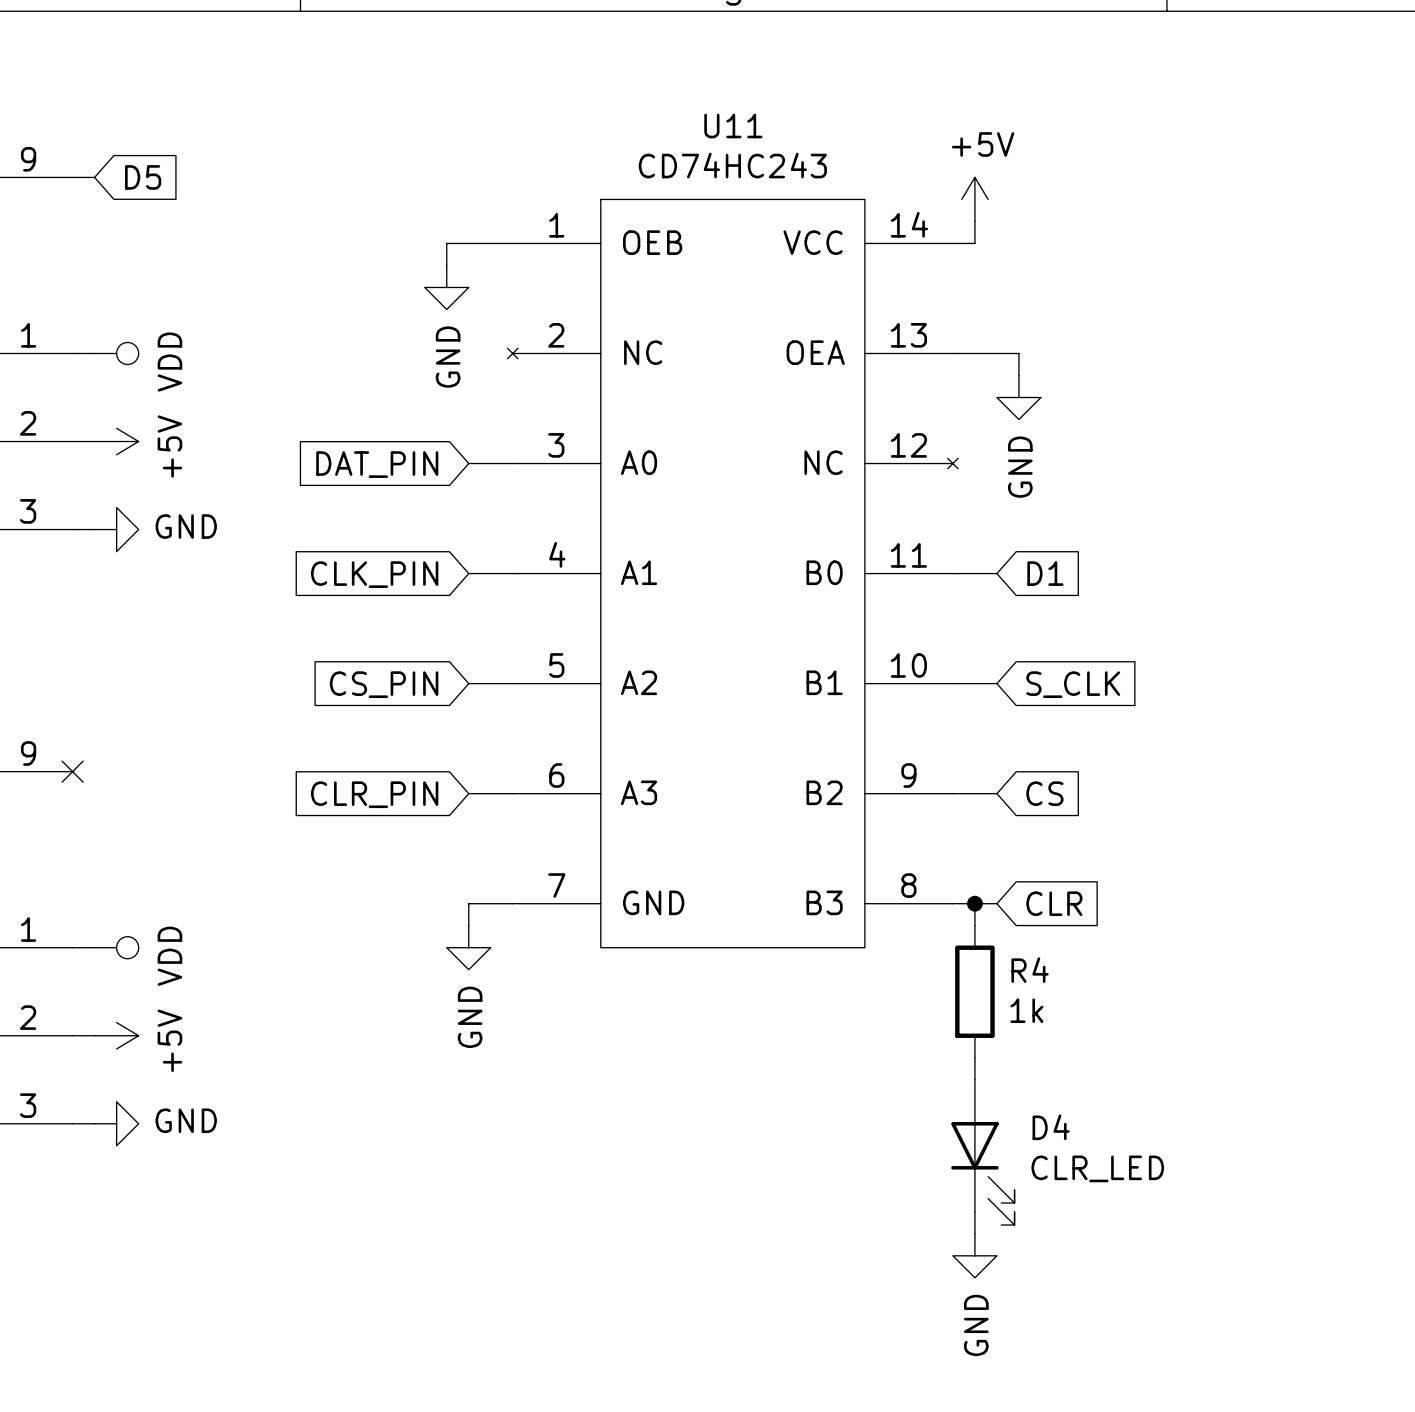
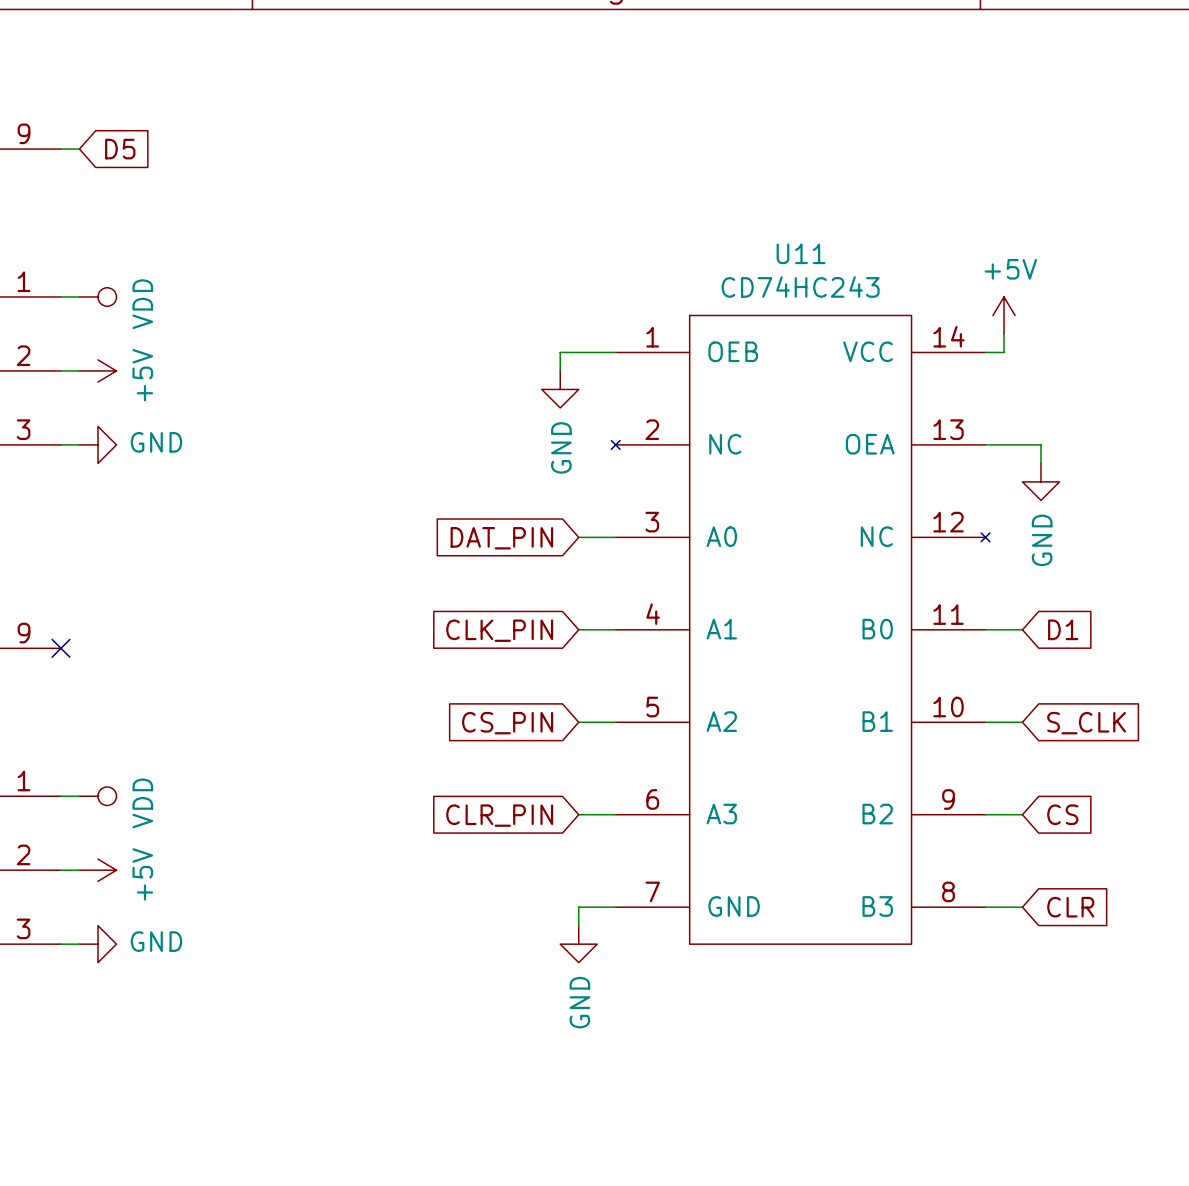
power symbol position: +5V (974, 199) -> +5V (1004, 315)
wire: (974, 221) (974, 243) (952, 243) -> (1004, 333) (1004, 352) (985, 352)
wire: (512, 243) (446, 243) (446, 265) -> (615, 352) (560, 352) (560, 370)
power symbol: GND (446, 287) -> none
wire: (952, 353) (1018, 353) (1018, 375) -> (985, 444) (1040, 444) (1040, 463)
power symbol: GND (1018, 397) -> none
wire: (468, 463) (512, 463) -> (578, 537) (615, 537)
power symbol: none -> GND (560, 389)
global label position: DAT_PIN (377, 464) -> DAT_PIN (501, 538)
wire: (468, 573) (512, 573) -> (578, 629) (615, 629)
U11 position: (732, 573) -> (800, 629)
wire: (952, 573) (996, 573) -> (985, 629) (1022, 629)
global label position: D1 (1045, 573) -> D1 (1063, 629)
power symbol: none -> GND (1040, 481)
global label position: CLK_PIN (374, 574) -> CLK_PIN (499, 630)
wire: (468, 683) (512, 683) -> (578, 722) (615, 722)
wire: (952, 683) (996, 683) -> (985, 722) (1022, 722)
global label position: CS_PIN (384, 684) -> CS_PIN (507, 723)
global label position: S_CLK (1073, 684) -> S_CLK (1086, 723)
wire: (468, 793) (512, 793) -> (578, 814) (615, 814)
wire: (952, 793) (996, 793) -> (985, 814) (1022, 814)
global label position: CS (1044, 793) -> CS (1062, 814)
global label position: CLR_PIN (374, 794) -> CLR_PIN (499, 815)
wire: (512, 903) (468, 903) (468, 925) -> (615, 907) (578, 907) (578, 925)
wire: (952, 903) (996, 903) -> (985, 907) (1022, 907)
wire: (974, 903) (974, 925) -> none
junction: (974, 903) -> none
global label position: CLR (1054, 903) -> CLR (1070, 907)
power symbol: GND (468, 947) -> none
R4: 1k (974, 991) -> none
wire: (974, 1057) (974, 1079) -> none
power symbol: none -> GND (578, 944)
D4: CLR_LED (982, 1152) -> none
wire: (974, 1211) (974, 1233) -> none
power symbol: GND (974, 1255) -> none

